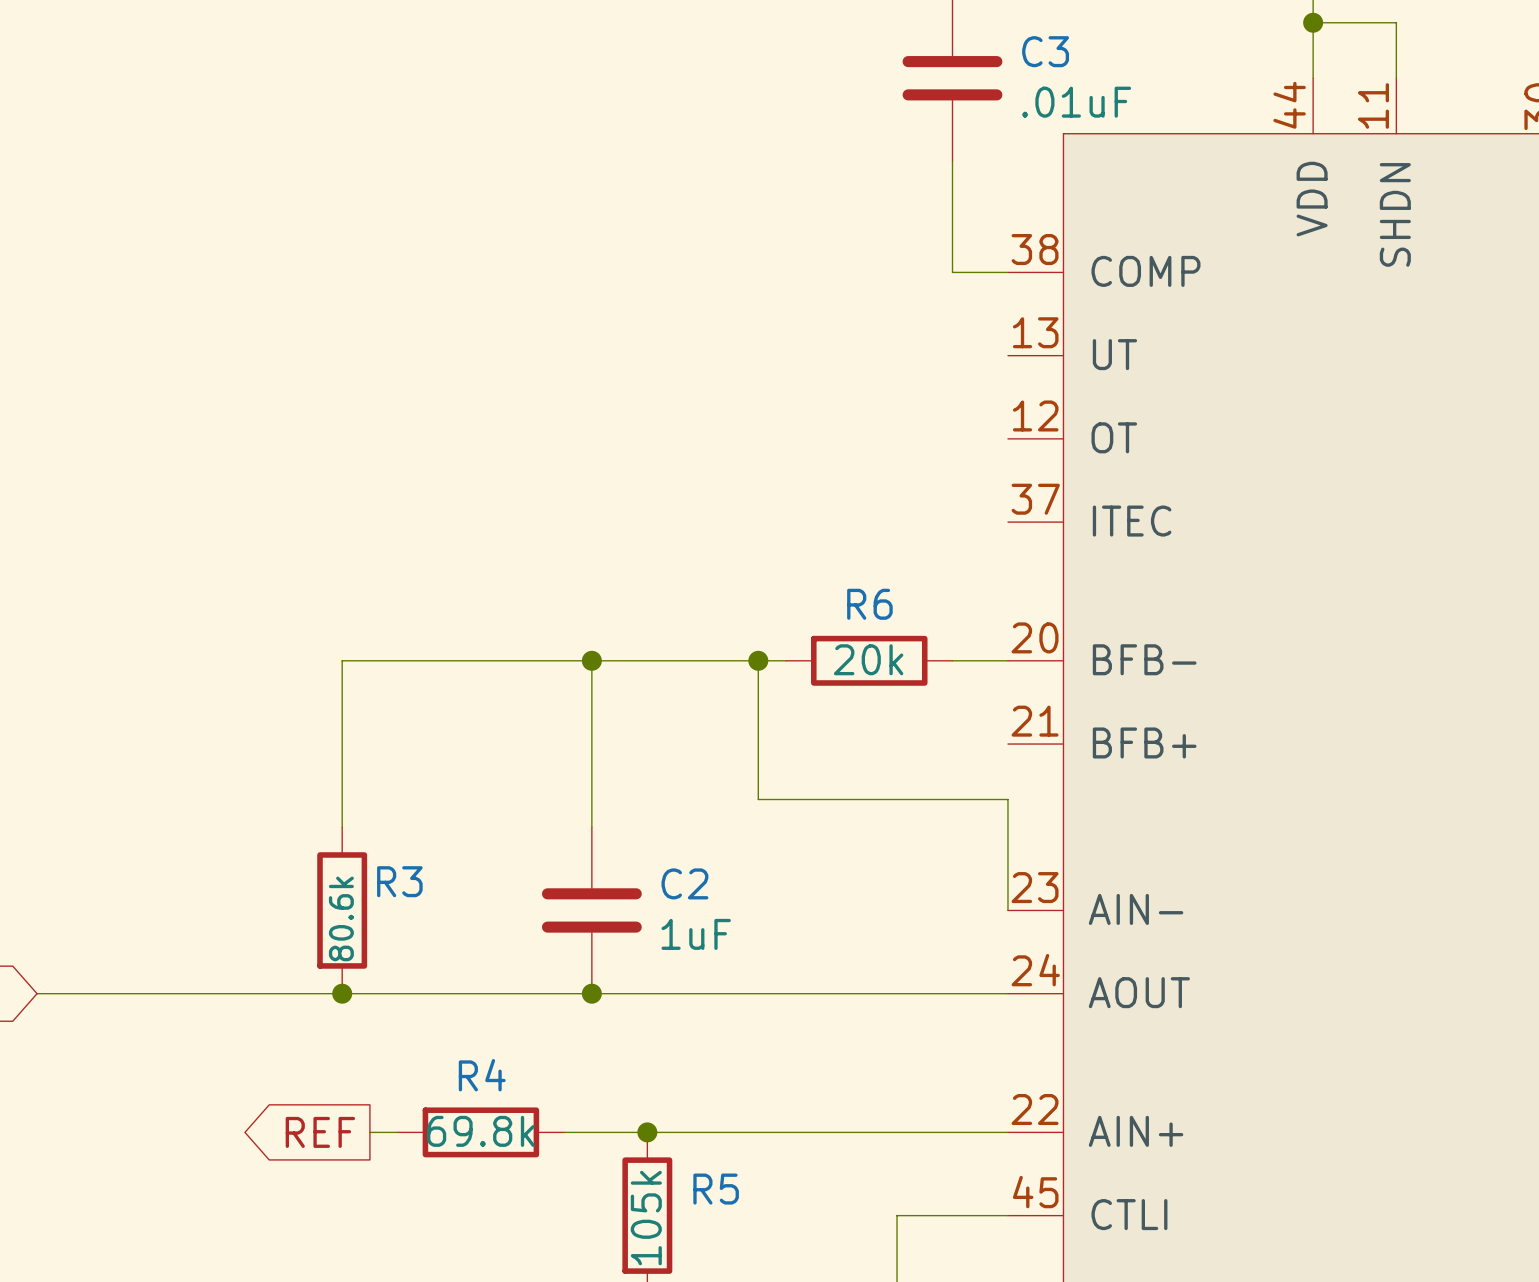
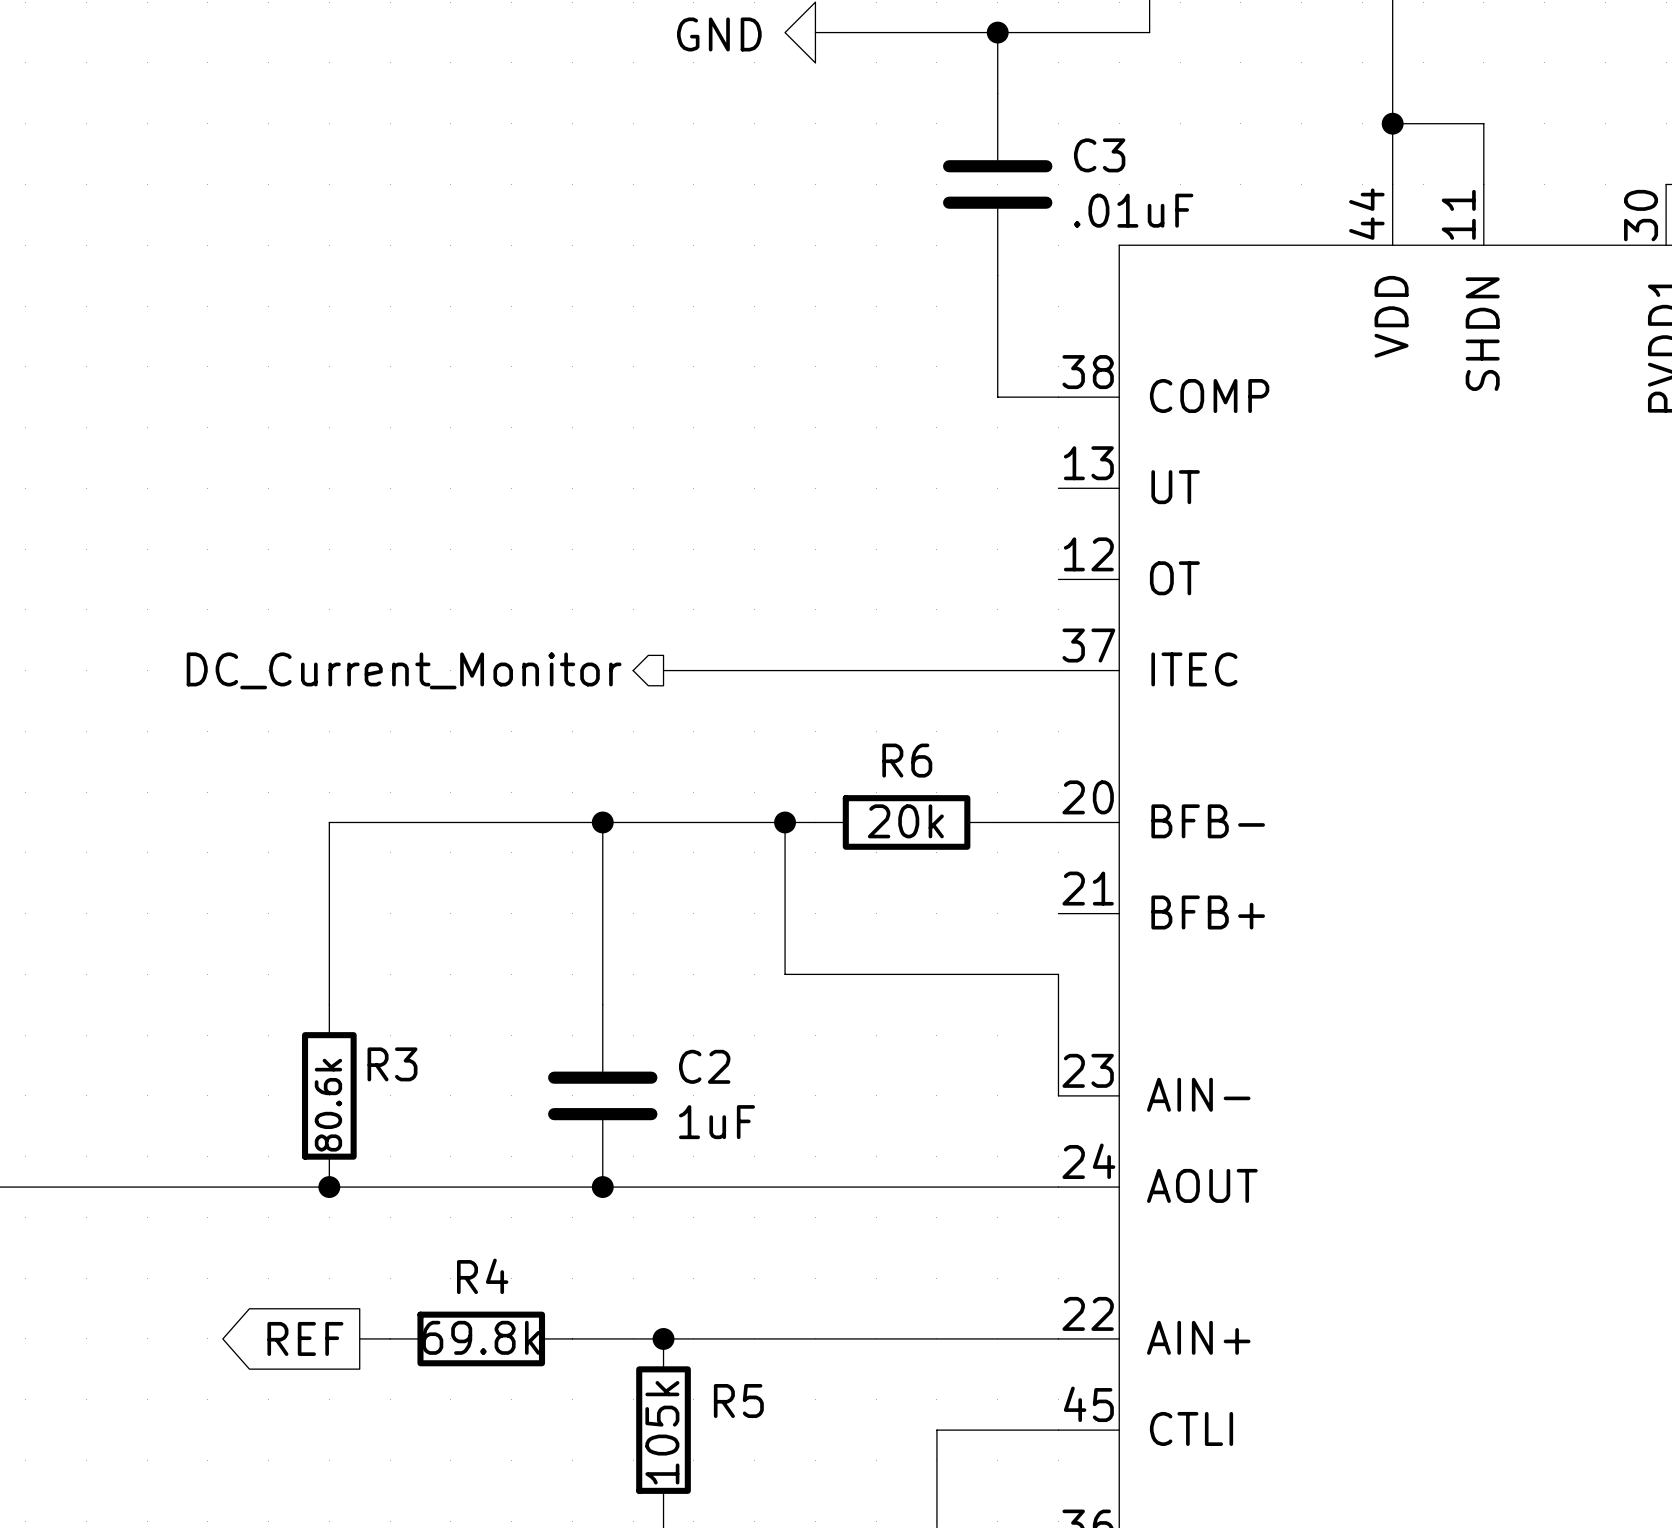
hierarchical label: none -> DC_Current_Monitor (404, 670)
wire: none -> (663, 670) (1058, 670)

